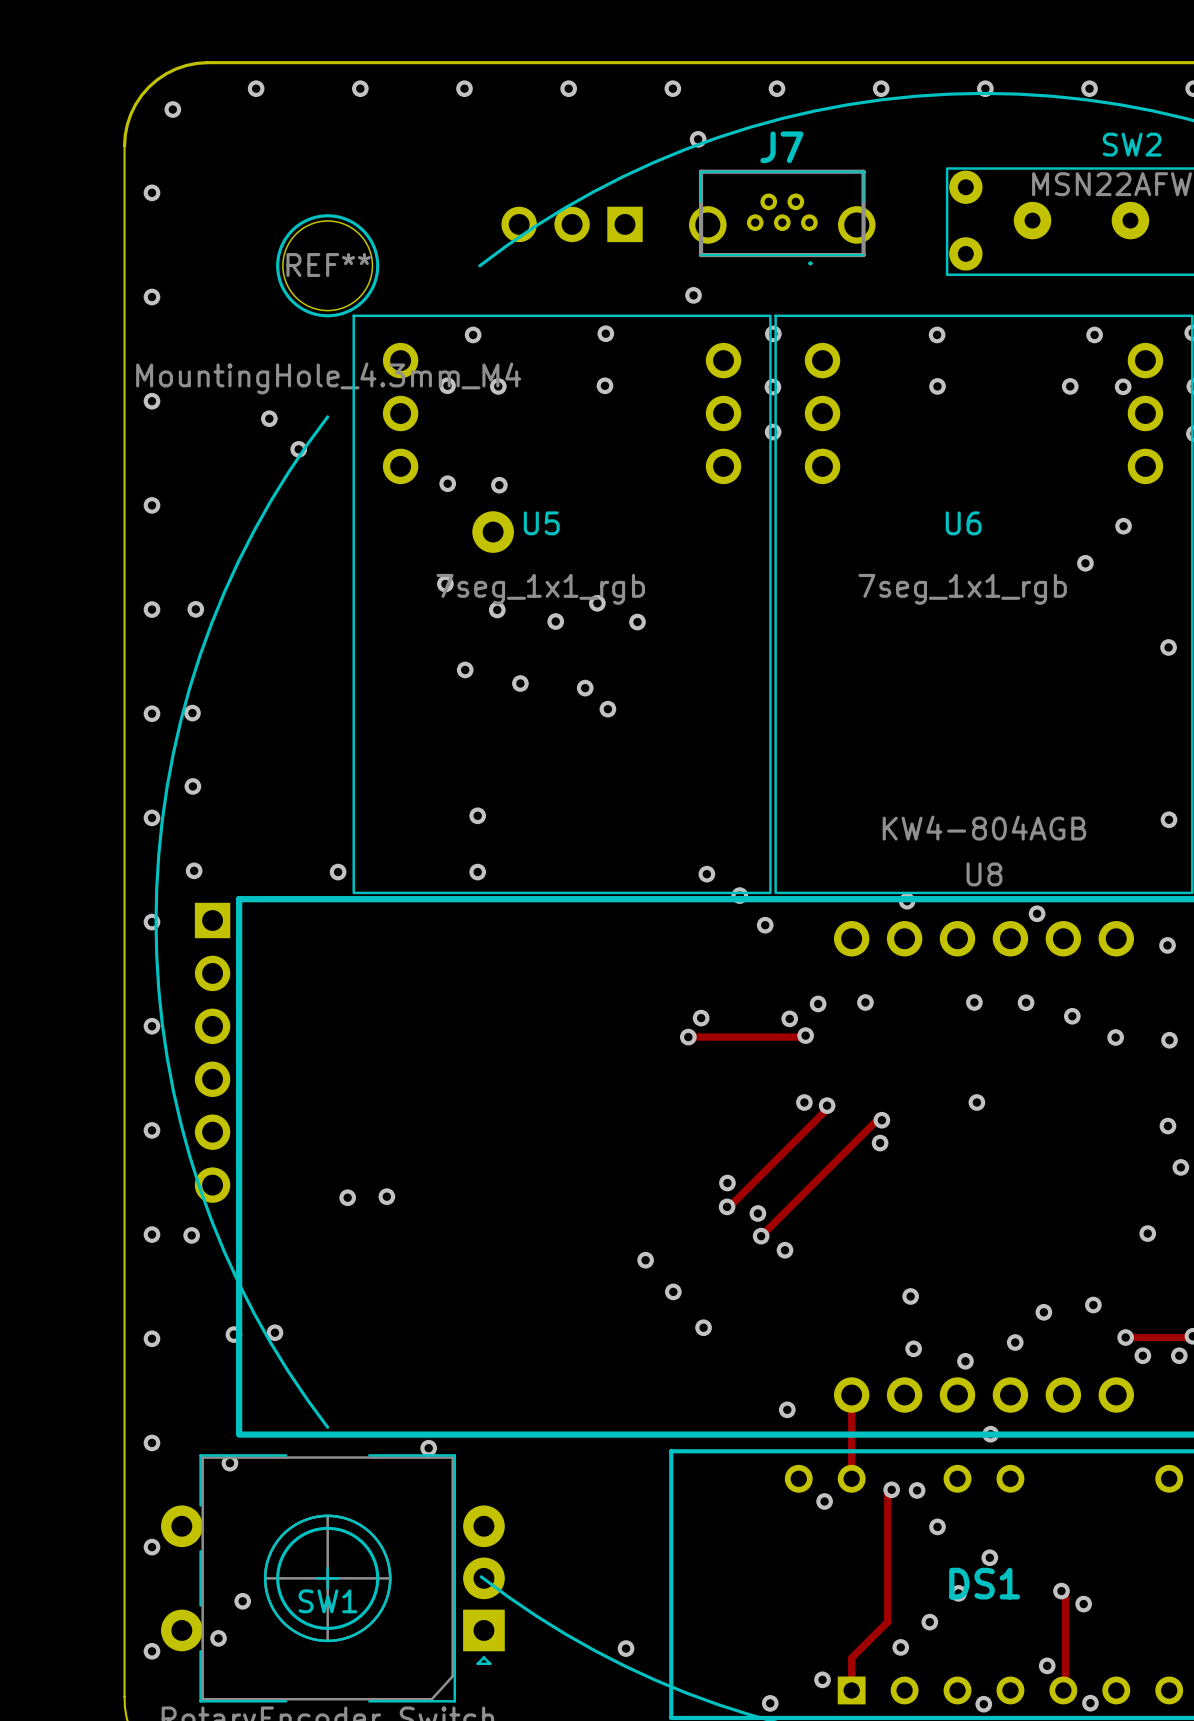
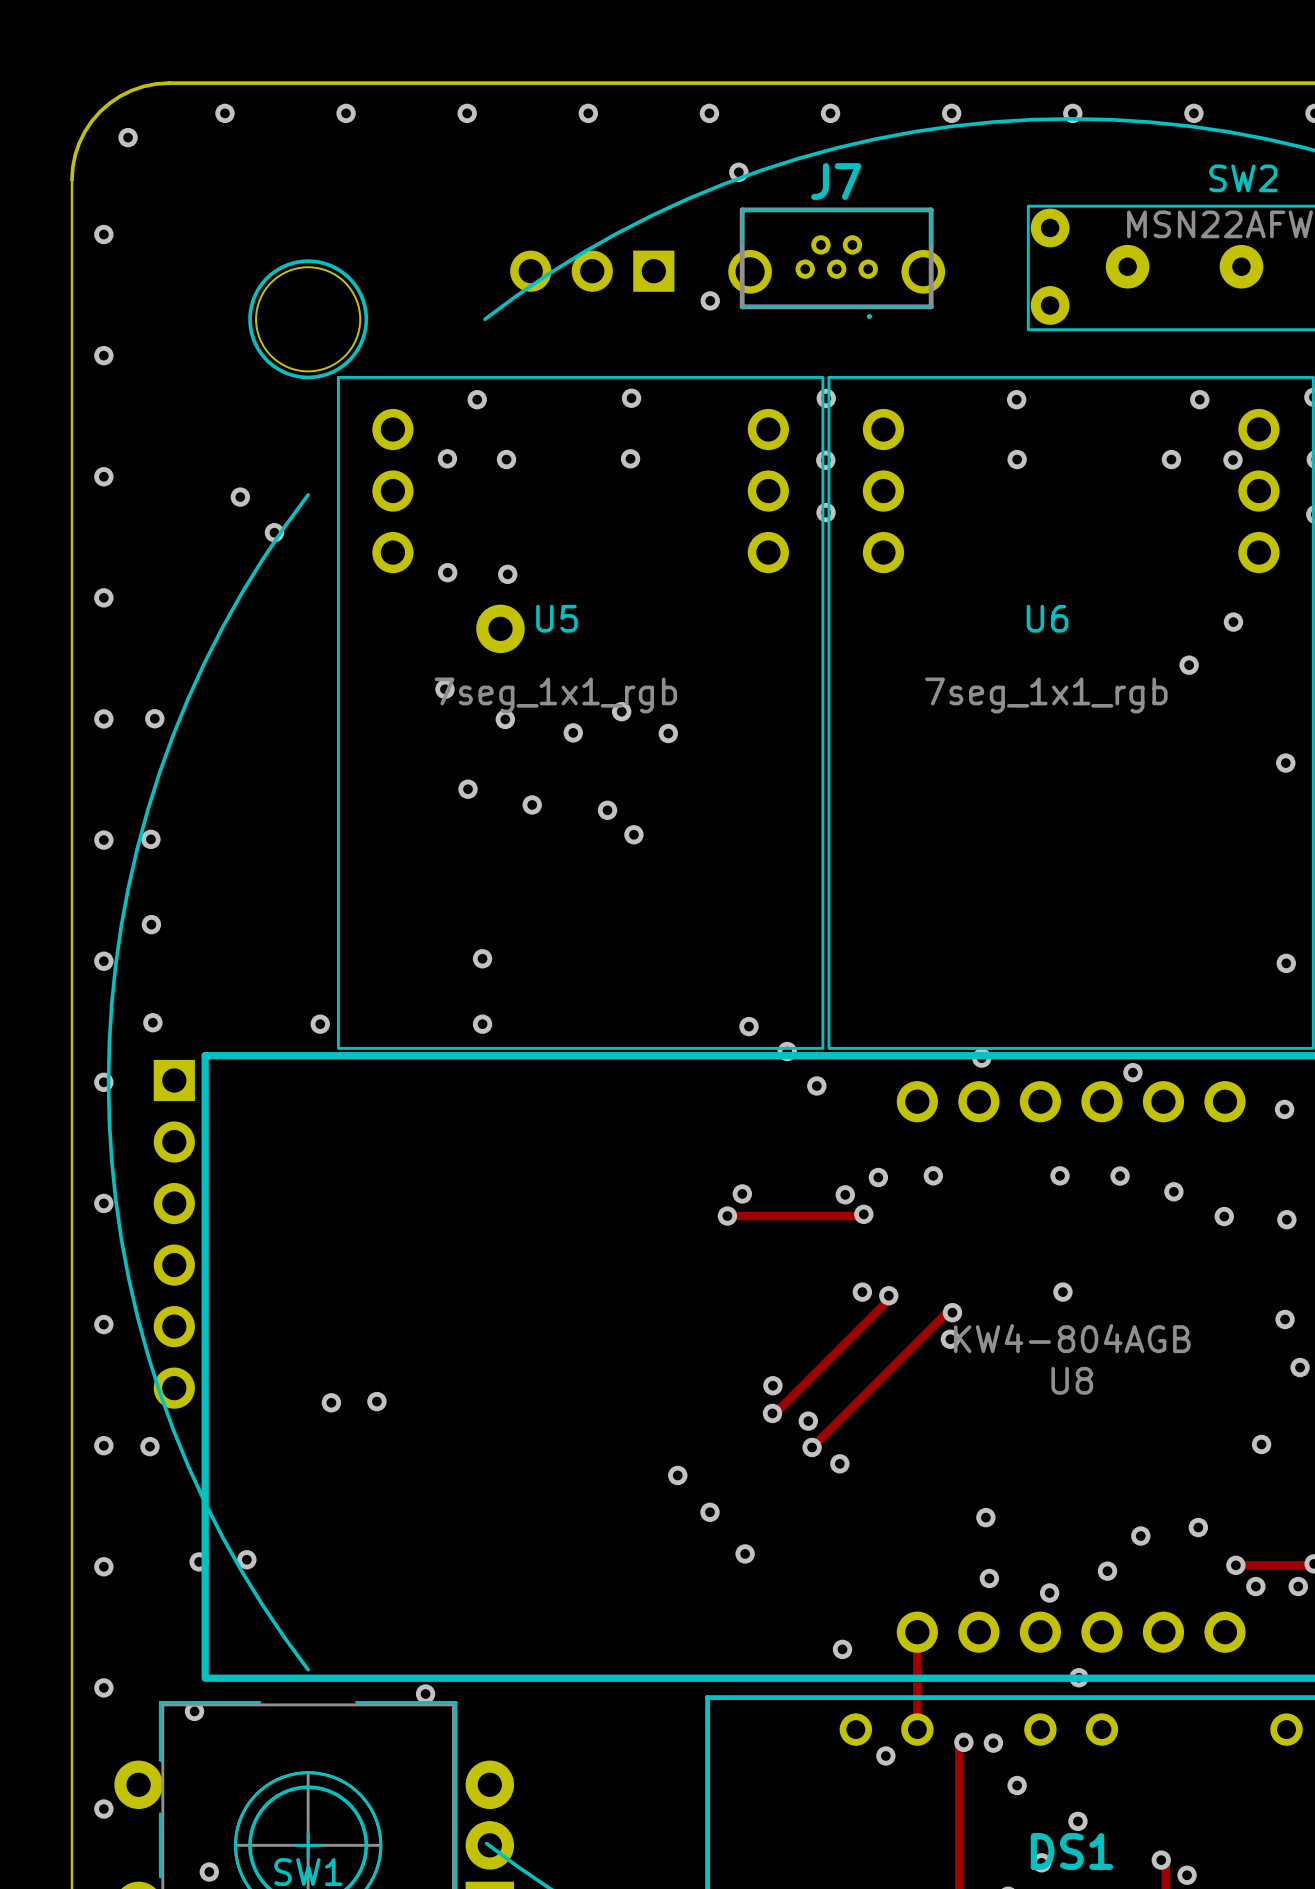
REF** name: REF** (328, 265) -> none
via position: (693, 295) -> (710, 300)
REF** value: MountingHole_4.3mm_M4 (328, 378) -> none
U8 value position: KW4-804AGB (984, 828) -> KW4-804AGB (1072, 1338)
U8 name position: U8 (984, 874) -> U8 (1072, 1380)

